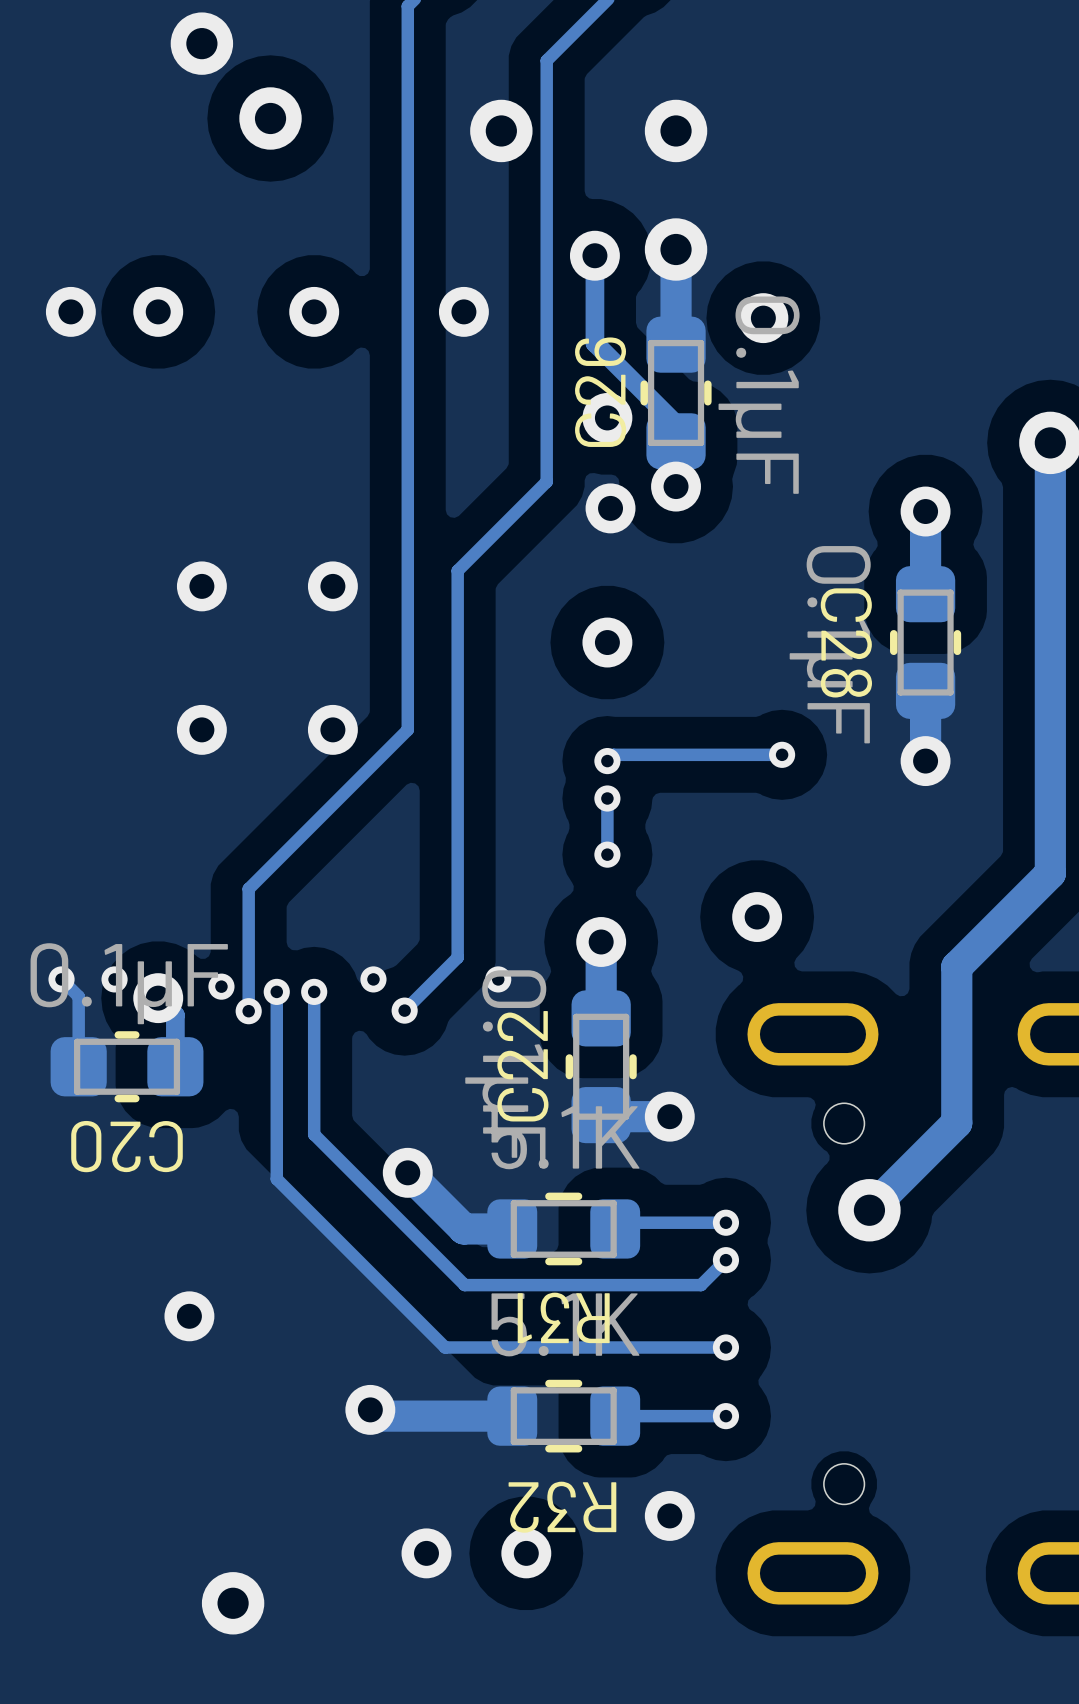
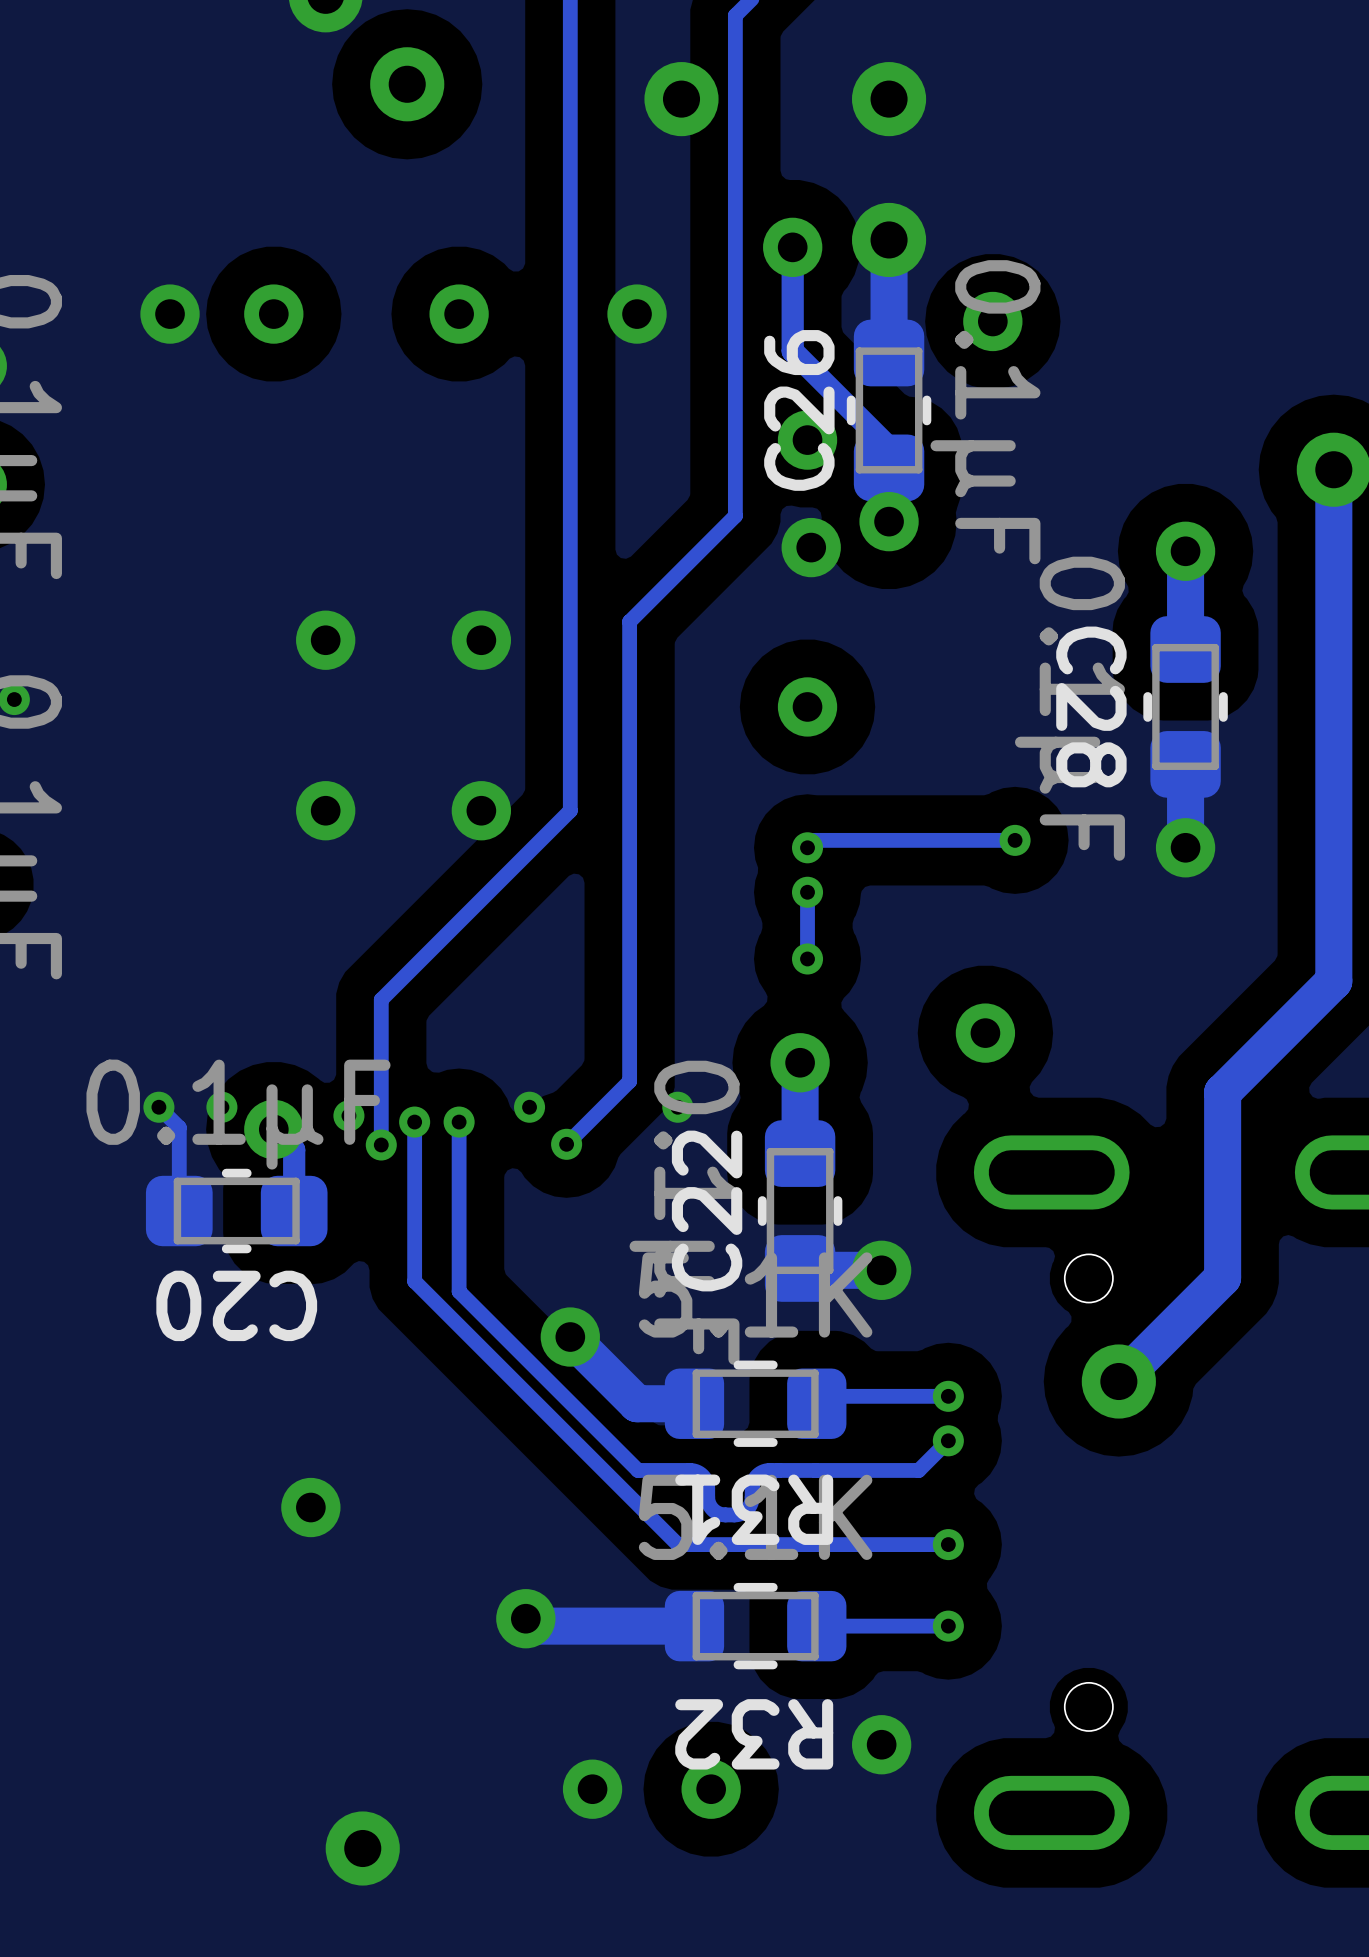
track: (276, 1125) (276, 1179) (445, 1347) (498, 1347) -> (414, 1281) (677, 1544)
track: (575, 1285) (508, 1285) -> (769, 1470) (762, 1472) (756, 1477) (752, 1484) (752, 1499) (749, 1506) (743, 1512) (734, 1514) (721, 1514) (712, 1509) (708, 1501) (707, 1486) (704, 1478) (699, 1473) (689, 1470)

